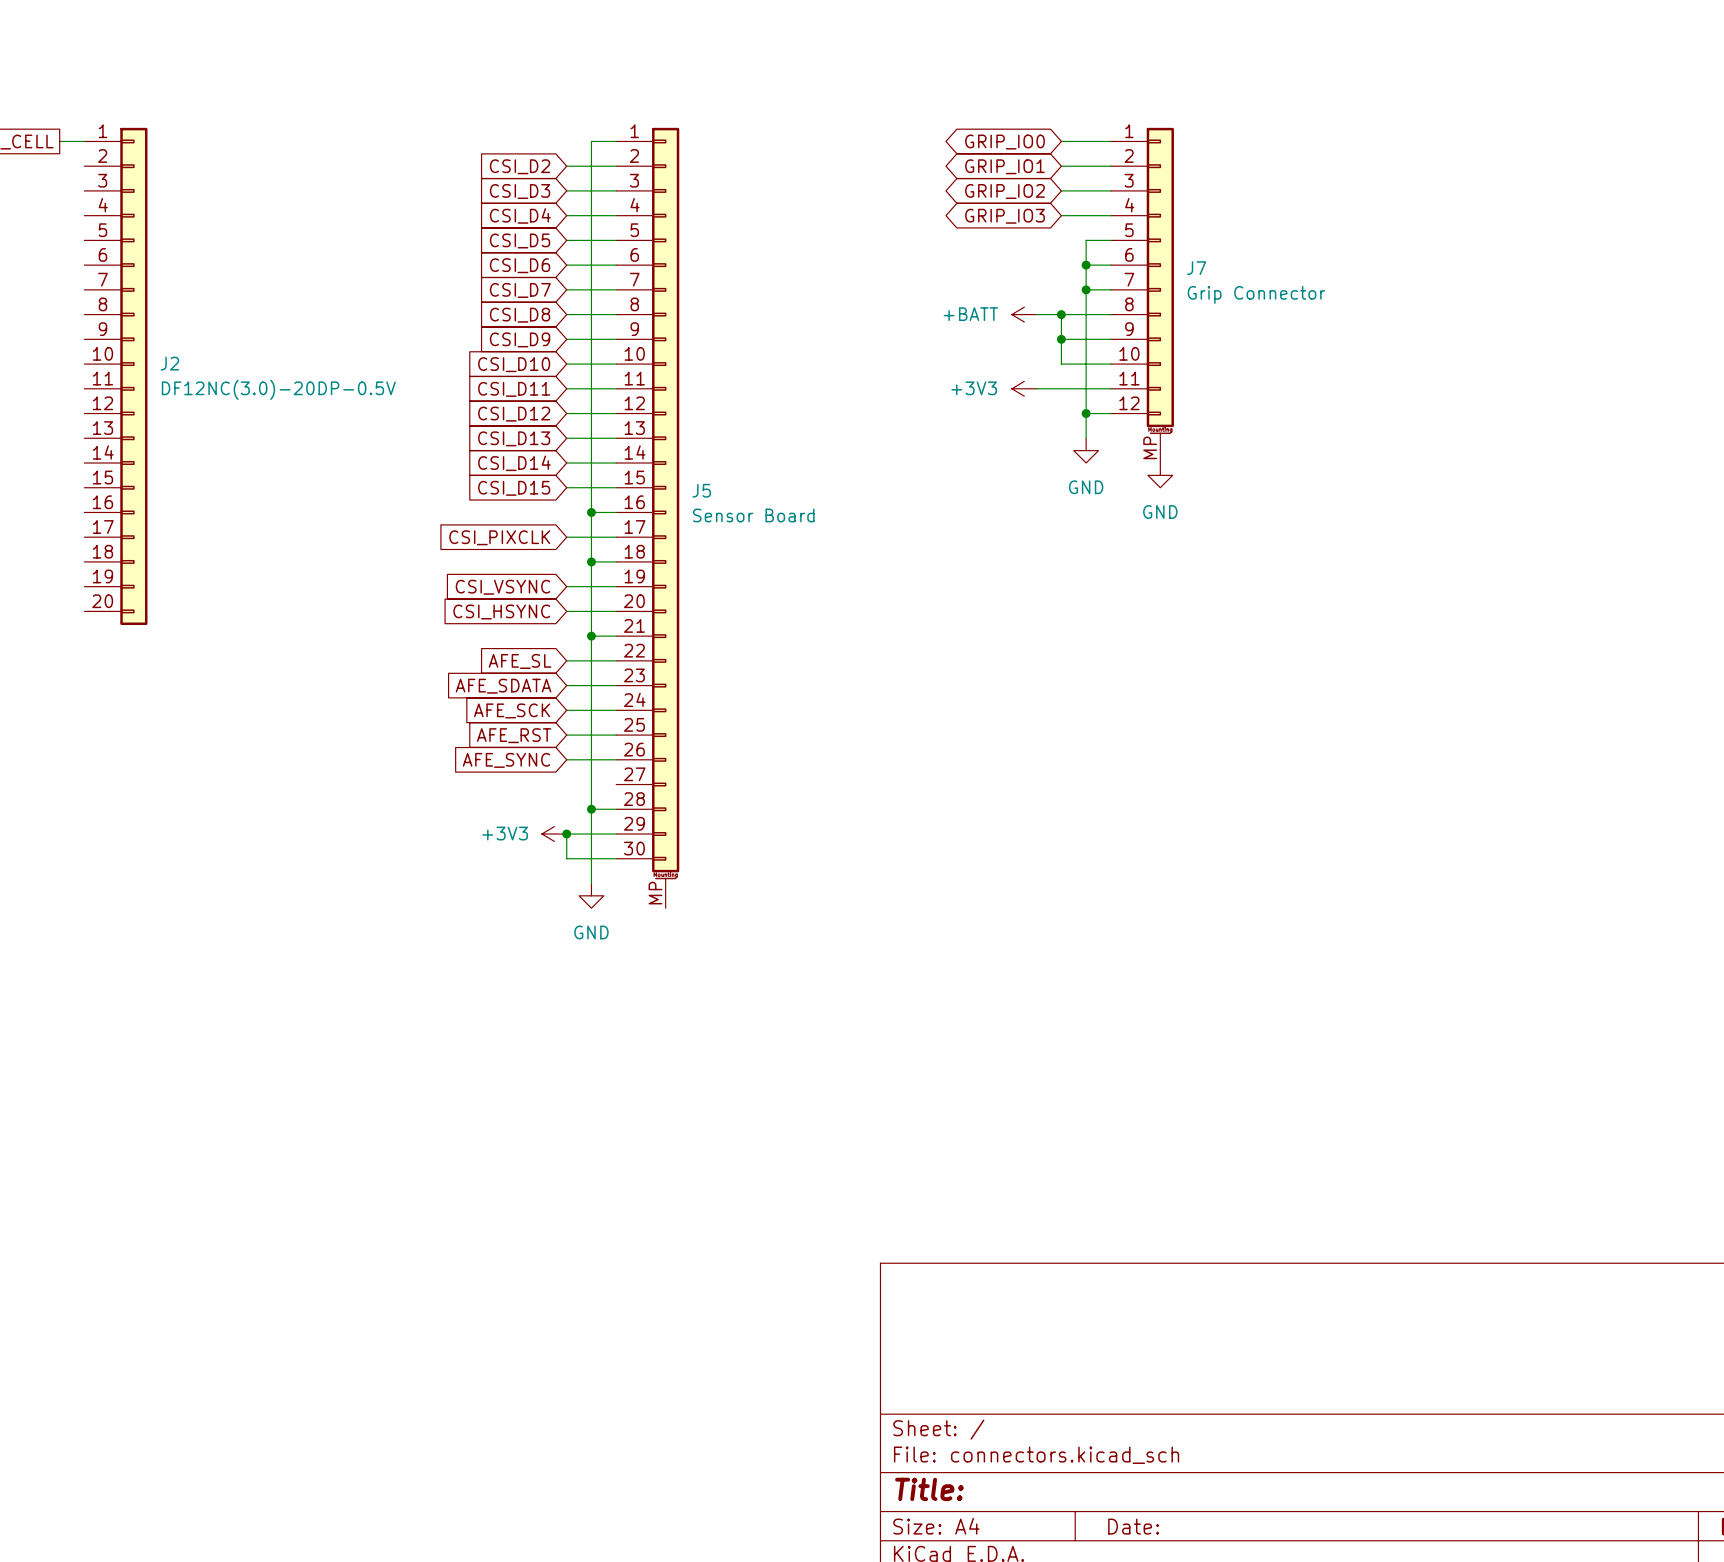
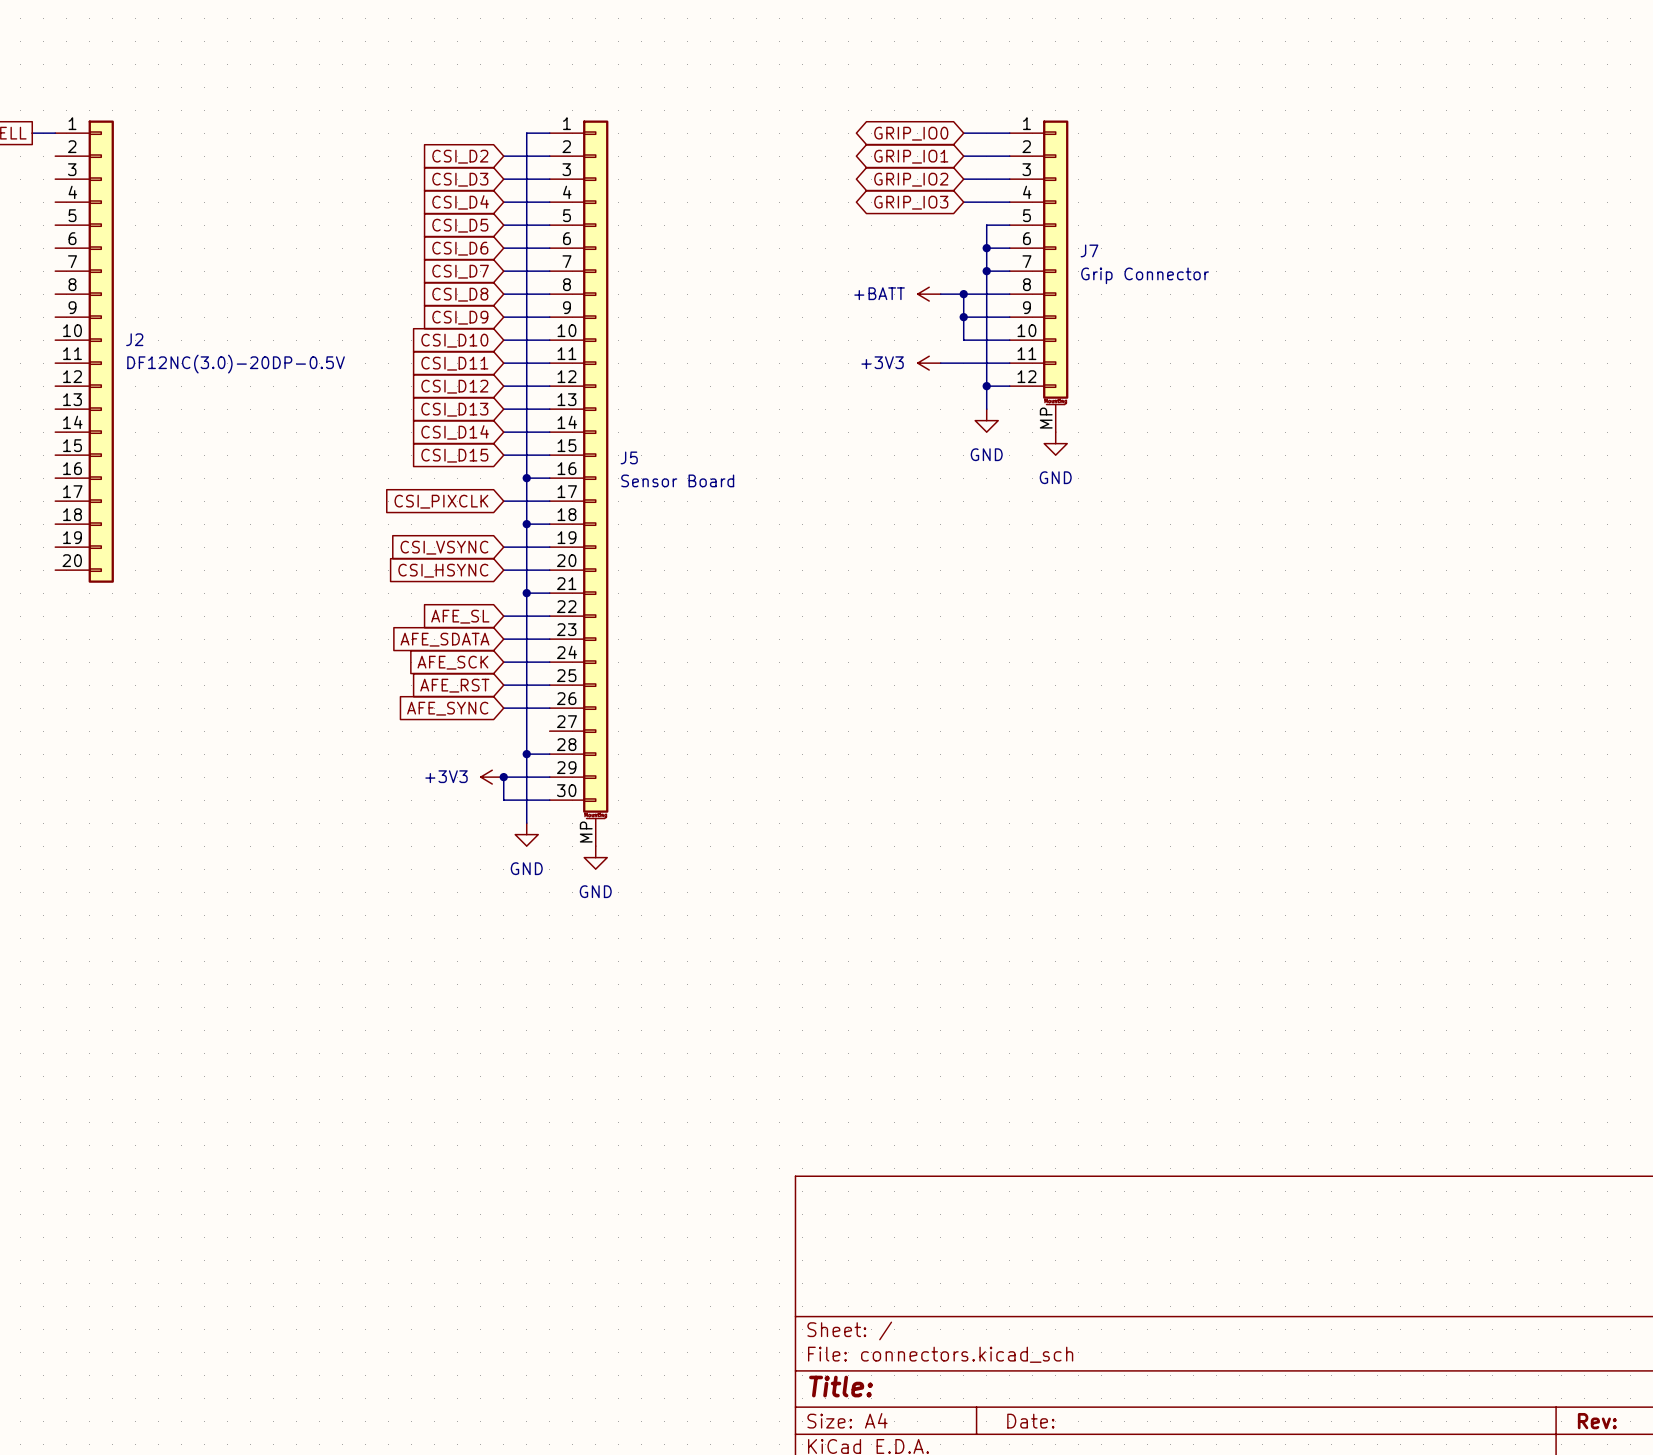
power symbol: none -> GND (595, 857)

